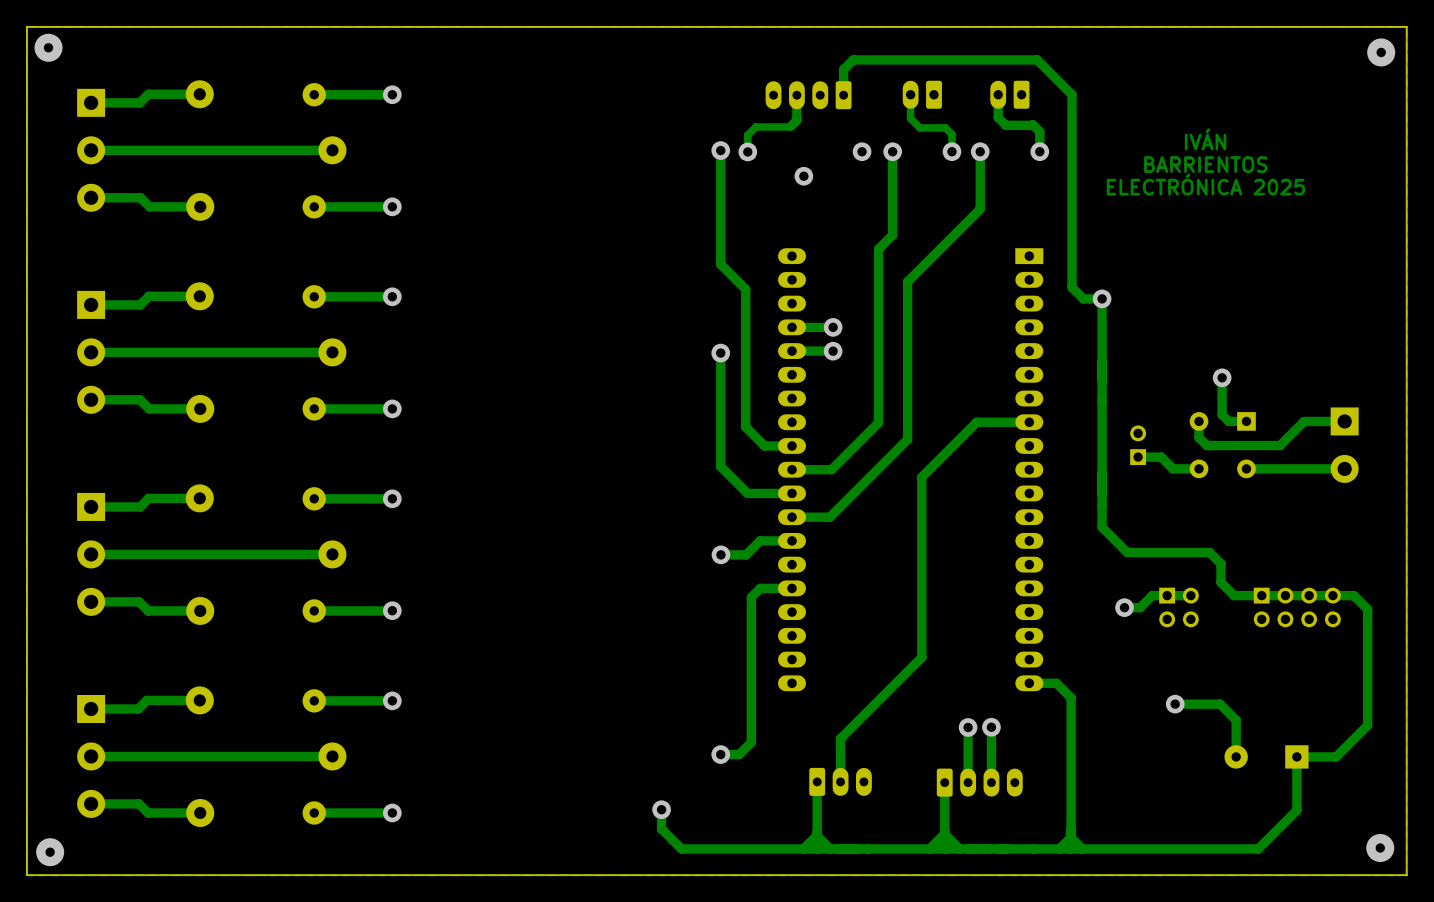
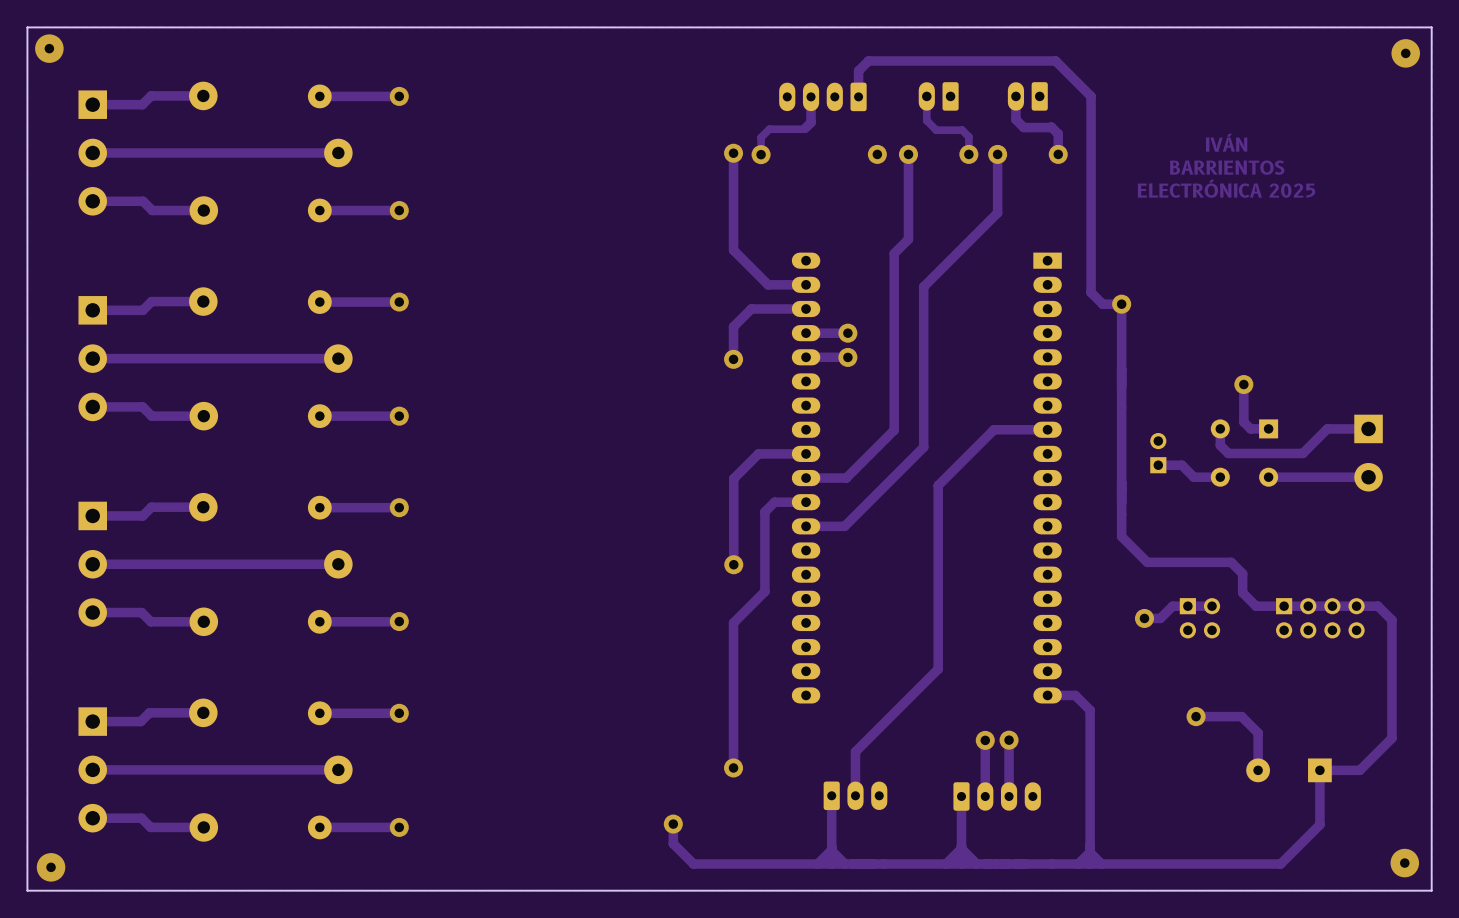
via: (803, 176) -> none
track: (720, 245) (720, 264) (745, 289) (745, 427) (764, 445) -> (733, 250) (768, 284) (806, 284)
track: (720, 353) (720, 466) (747, 493) (761, 493) -> (733, 359) (733, 326) (751, 308) (806, 308)
track: (792, 540) (760, 540) (746, 554) (720, 554) -> (778, 453) (758, 453) (733, 478) (733, 564)
track: (792, 588) (760, 588) (751, 597) (751, 742) (739, 754) (720, 754) -> (774, 502) (764, 511) (764, 591) (733, 622) (733, 767)

